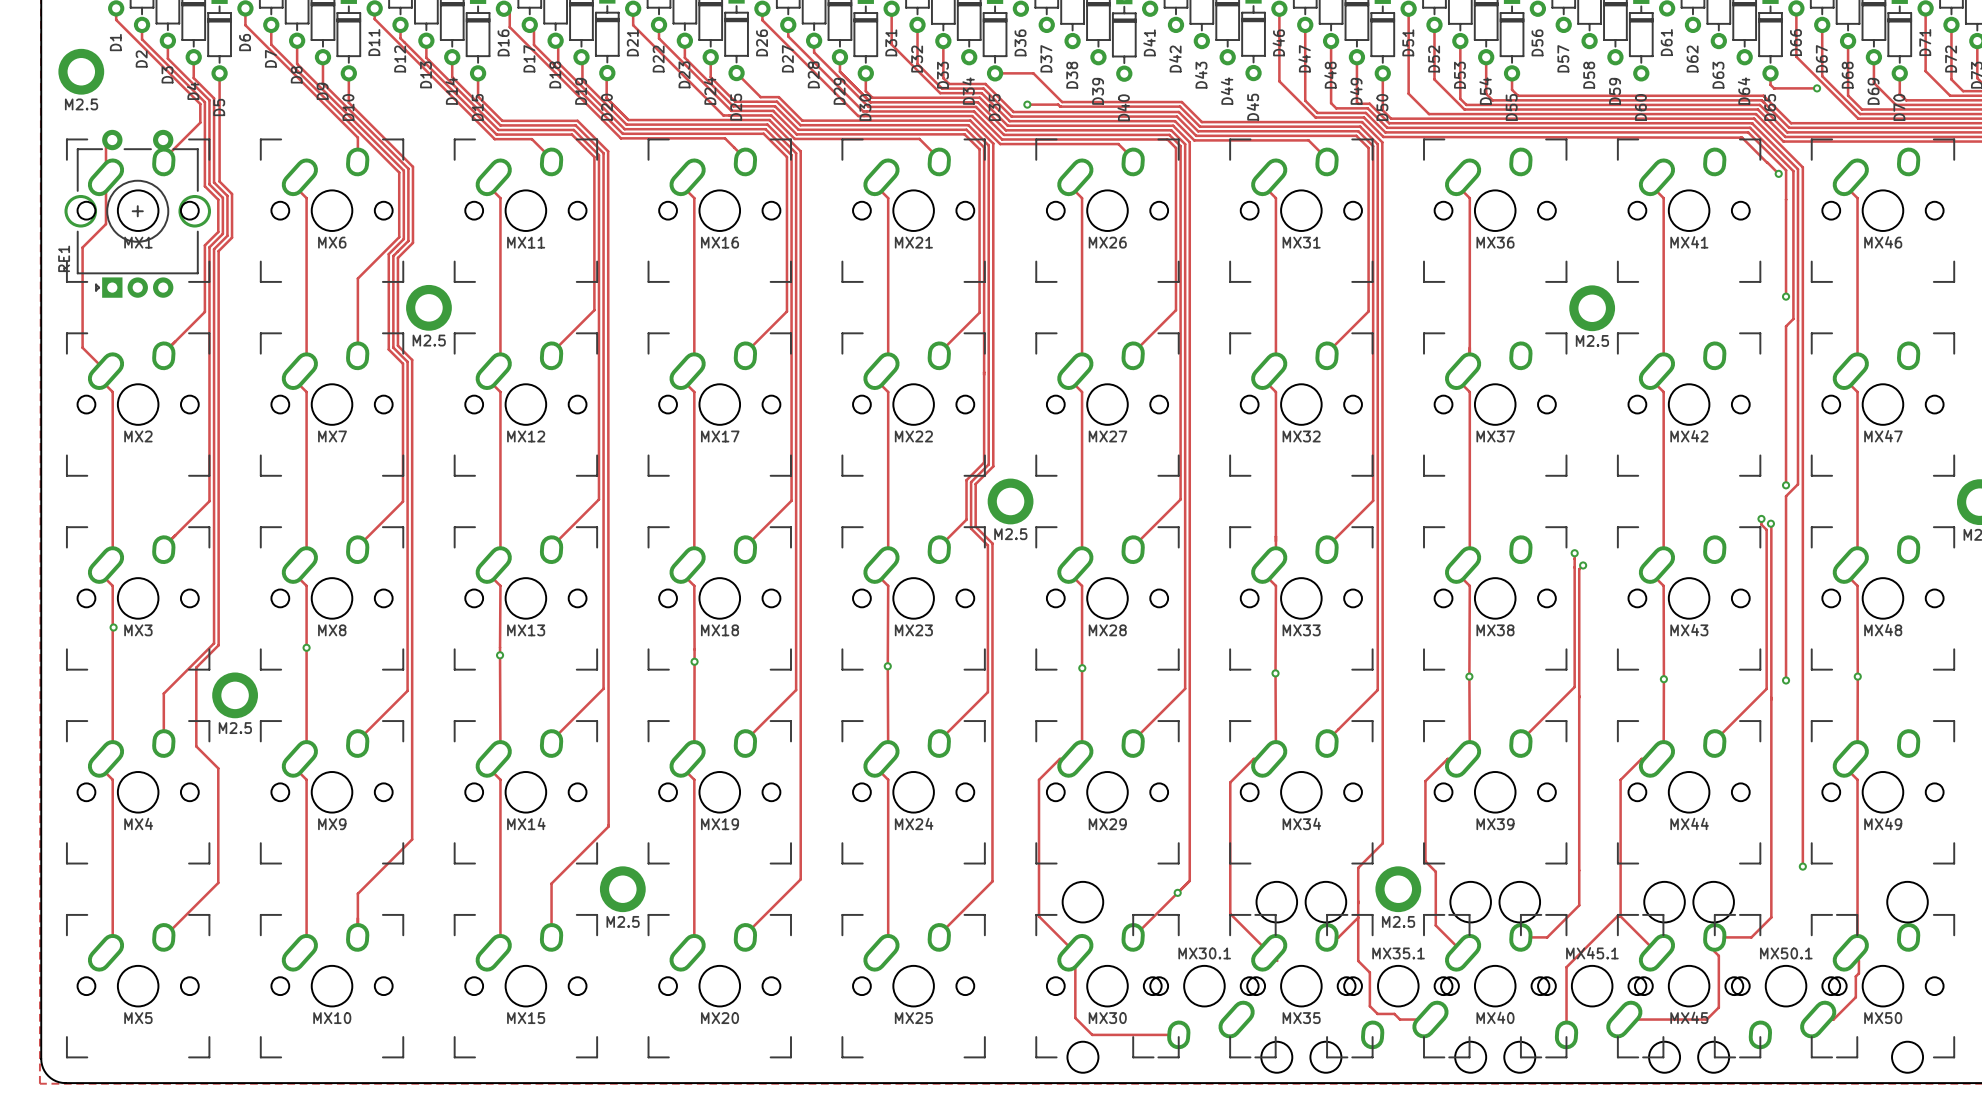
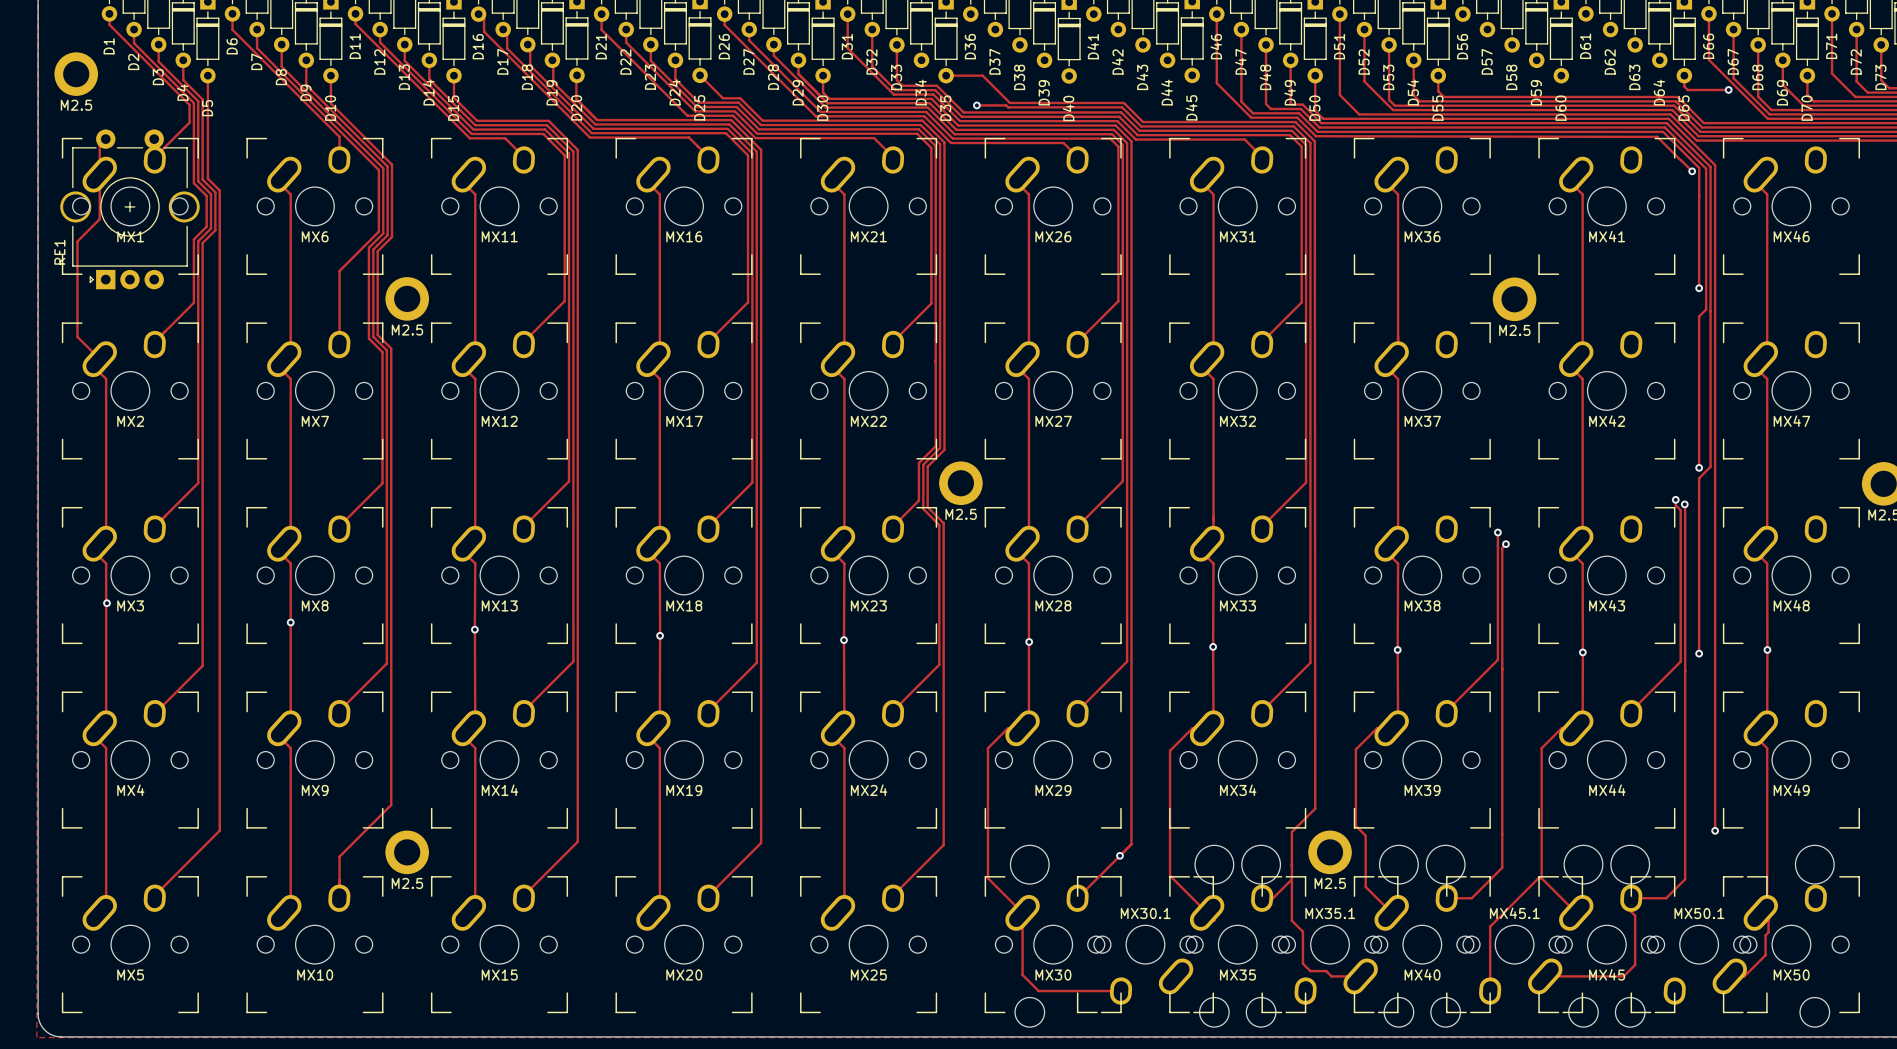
track: (608, 151) (608, 826) (551, 883) (551, 937) -> (577, 149) (577, 841) (524, 895)
track: (232, 237) (218, 251) (218, 645) (196, 667) (196, 746) (218, 768) (218, 882) (163, 937) -> (219, 232) (219, 830) (154, 895)
track: (214, 643) (163, 693) (163, 743) -> (202, 618) (202, 665) (154, 713)
part: M2.5 (235, 695) -> none
part: none -> M2.5 (407, 852)
part: M2.5 (622, 889) -> none

